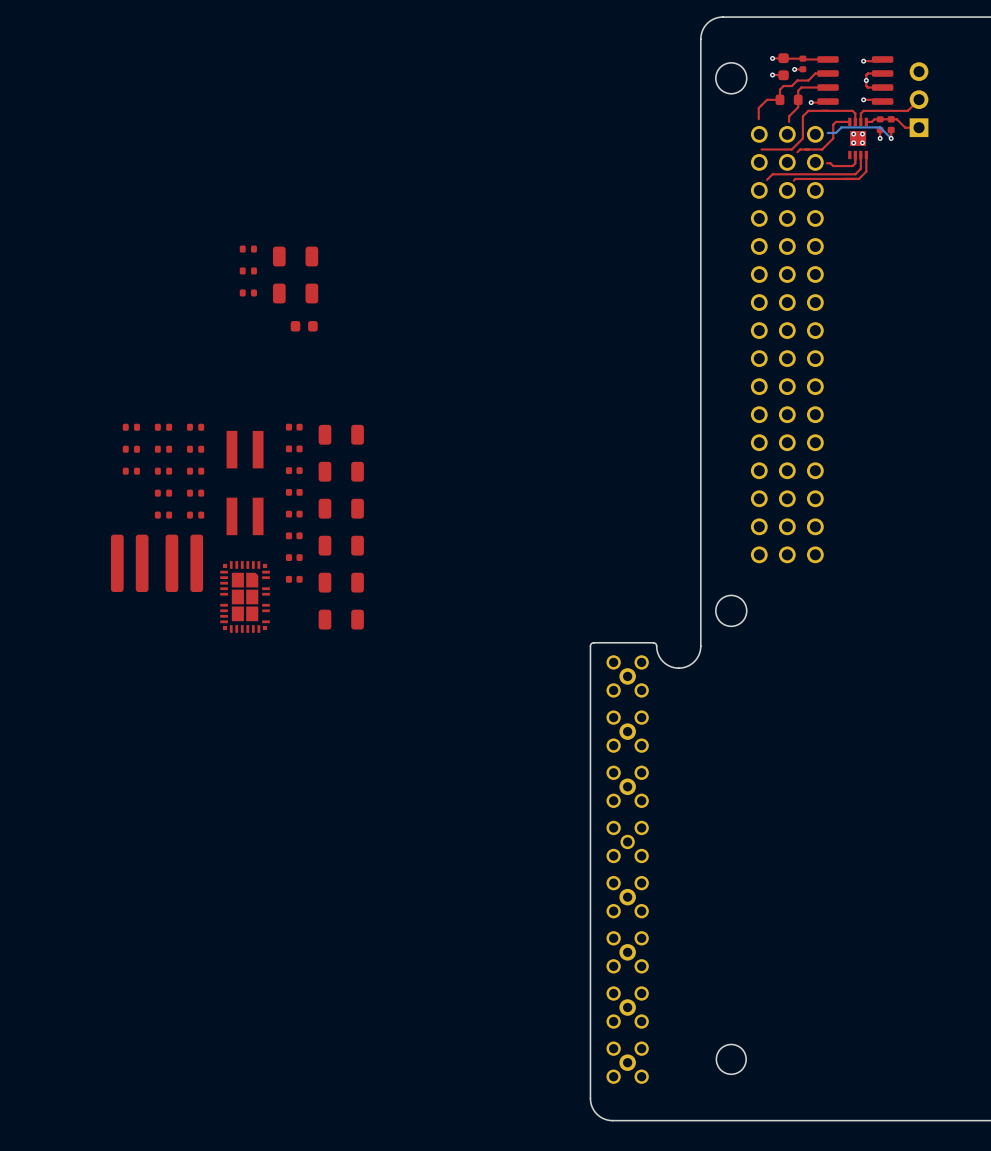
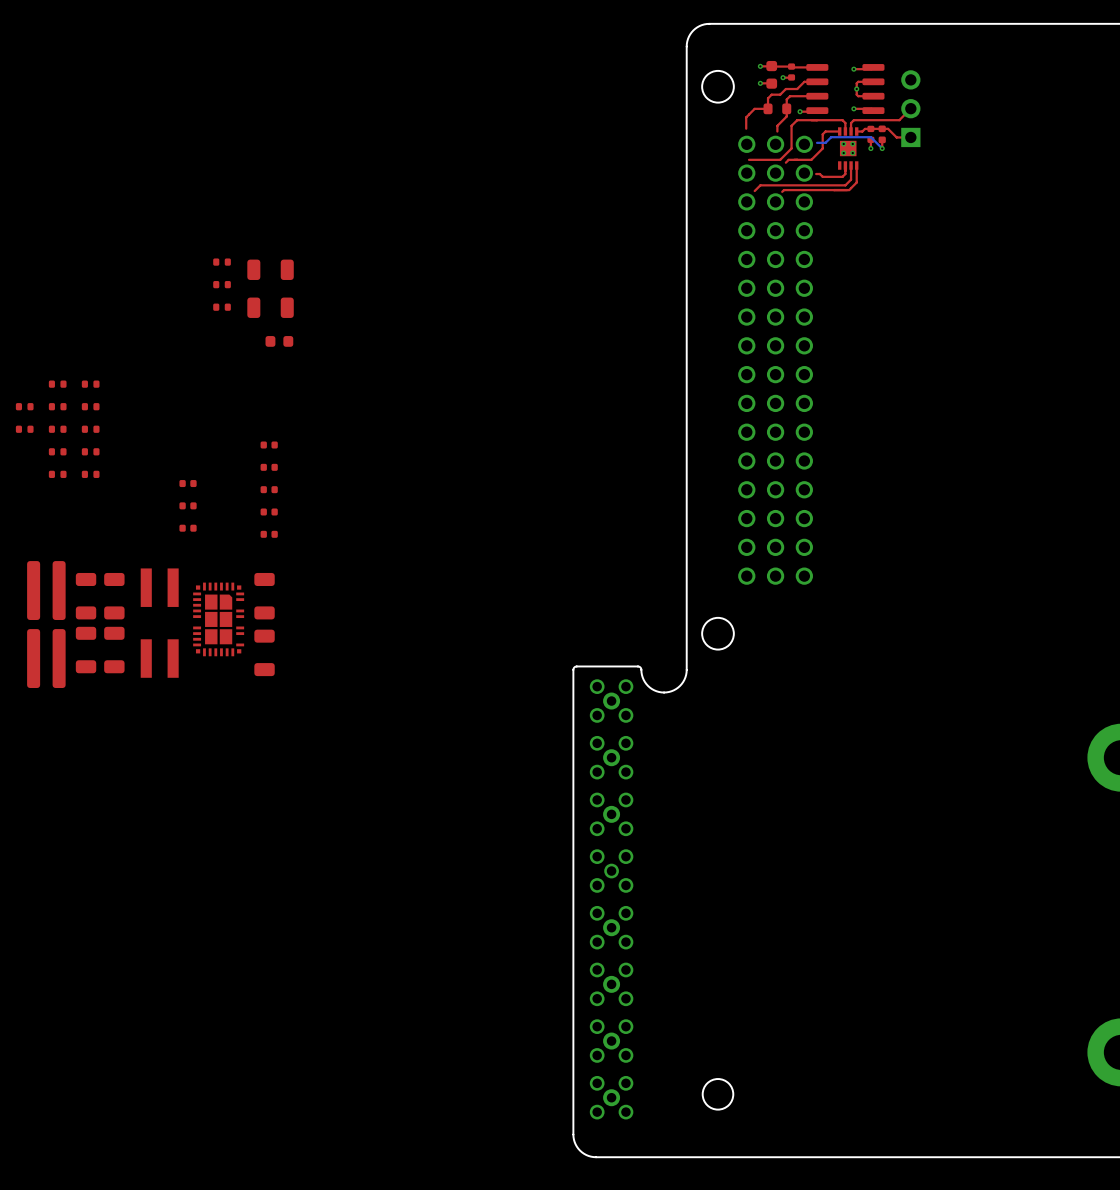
part: none -> (57, 384)
part: none -> (90, 384)
part: none -> (24, 406)
part: none -> (57, 406)
part: none -> (90, 406)
part: none -> (24, 429)
part: none -> (57, 429)
part: none -> (90, 429)
part: (131, 427) -> none
part: (163, 427) -> none
part: (195, 427) -> none
part: none -> (57, 451)
part: none -> (90, 451)
part: (341, 434) -> none
part: (131, 449) -> none
part: (163, 449) -> none
part: (195, 449) -> none
part: (245, 449) -> none
part: none -> (57, 474)
part: none -> (90, 474)
part: none -> (188, 483)
part: (131, 471) -> none
part: (163, 471) -> none
part: (195, 471) -> none
part: (341, 471) -> none
part: none -> (188, 505)
part: (163, 493) -> none
part: (195, 493) -> none
part: none -> (188, 528)
part: (341, 508) -> none
part: (163, 515) -> none
part: (195, 515) -> none
part: (245, 516) -> none
part footprint: [165, 534, 204, 593] -> [140, 568, 179, 607]
part: (294, 535) -> none
part: (341, 545) -> none
part: (294, 557) -> none
part: (129, 563) -> none
part: none -> (46, 590)
part: none -> (86, 596)
part: none -> (114, 596)
part footprint: [285, 575, 303, 583] -> [254, 572, 275, 620]
part: (341, 582) -> none
part: (341, 619) -> none
part: none -> (86, 650)
part: none -> (114, 650)
part: none -> (264, 652)
part: none -> (46, 658)
part: none -> (159, 658)

